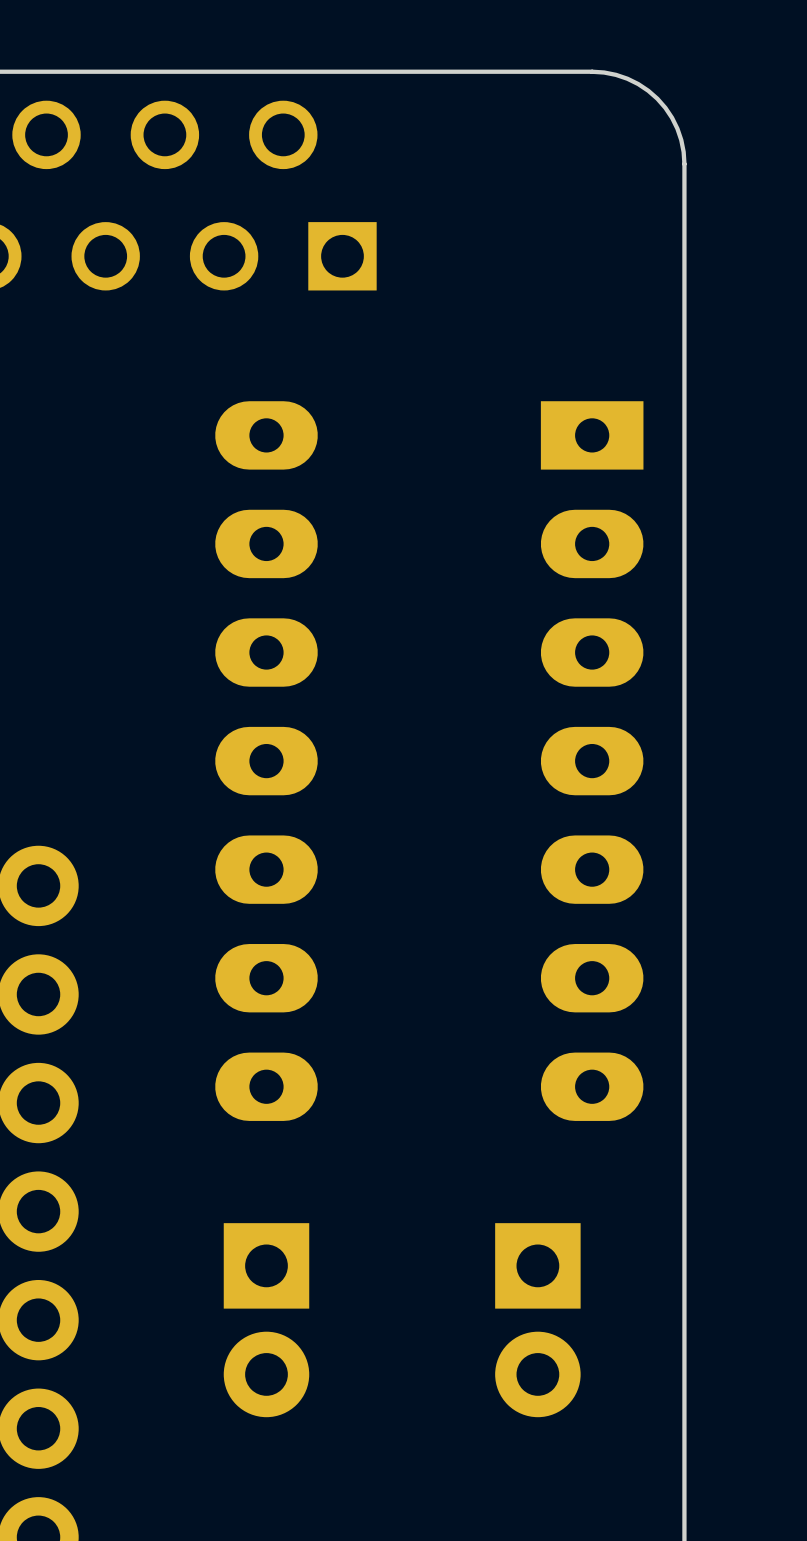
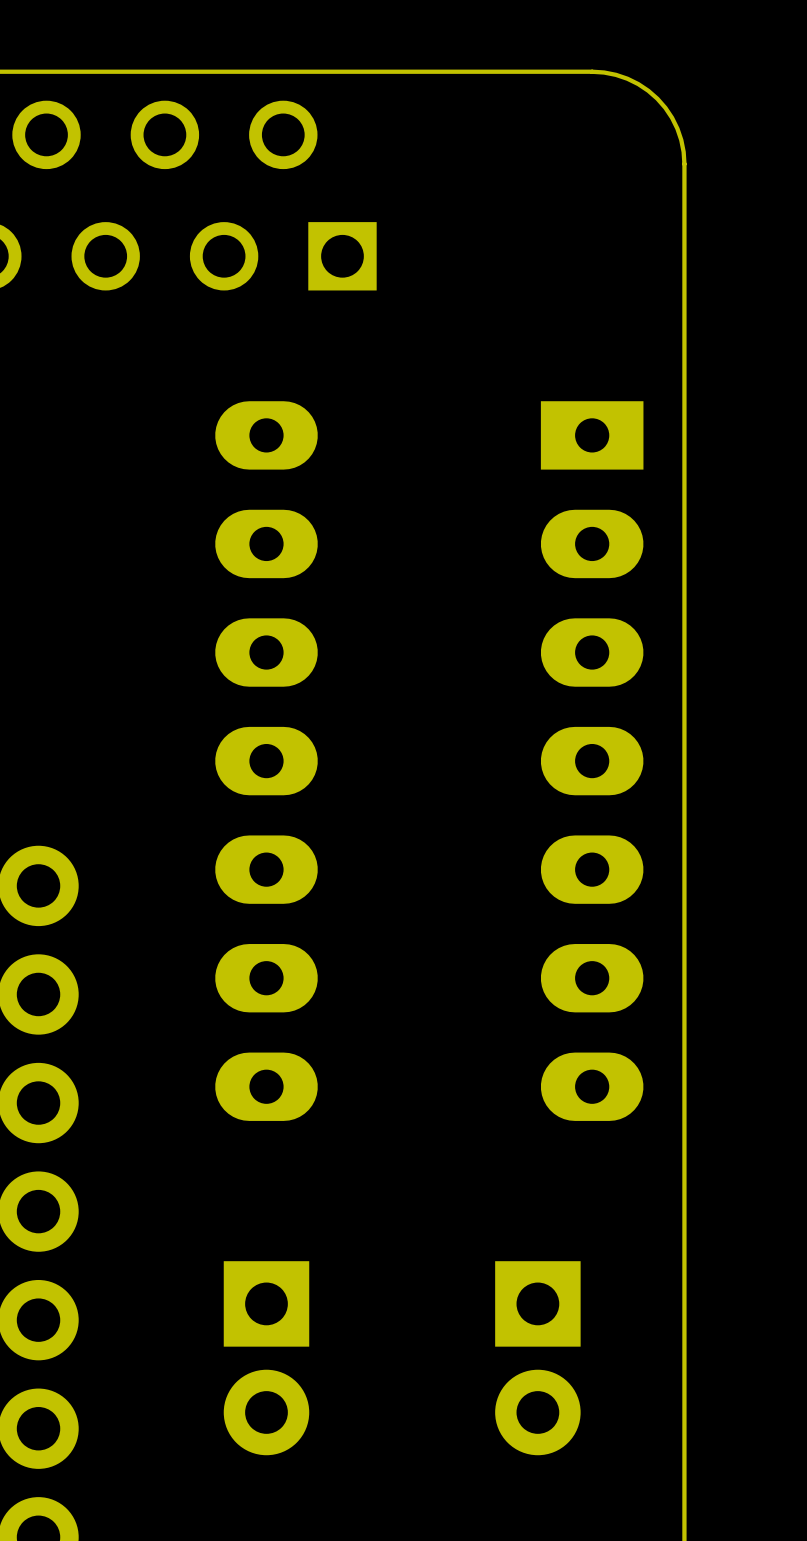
part position: (266, 1320) -> (266, 1358)
part position: (537, 1320) -> (537, 1358)

